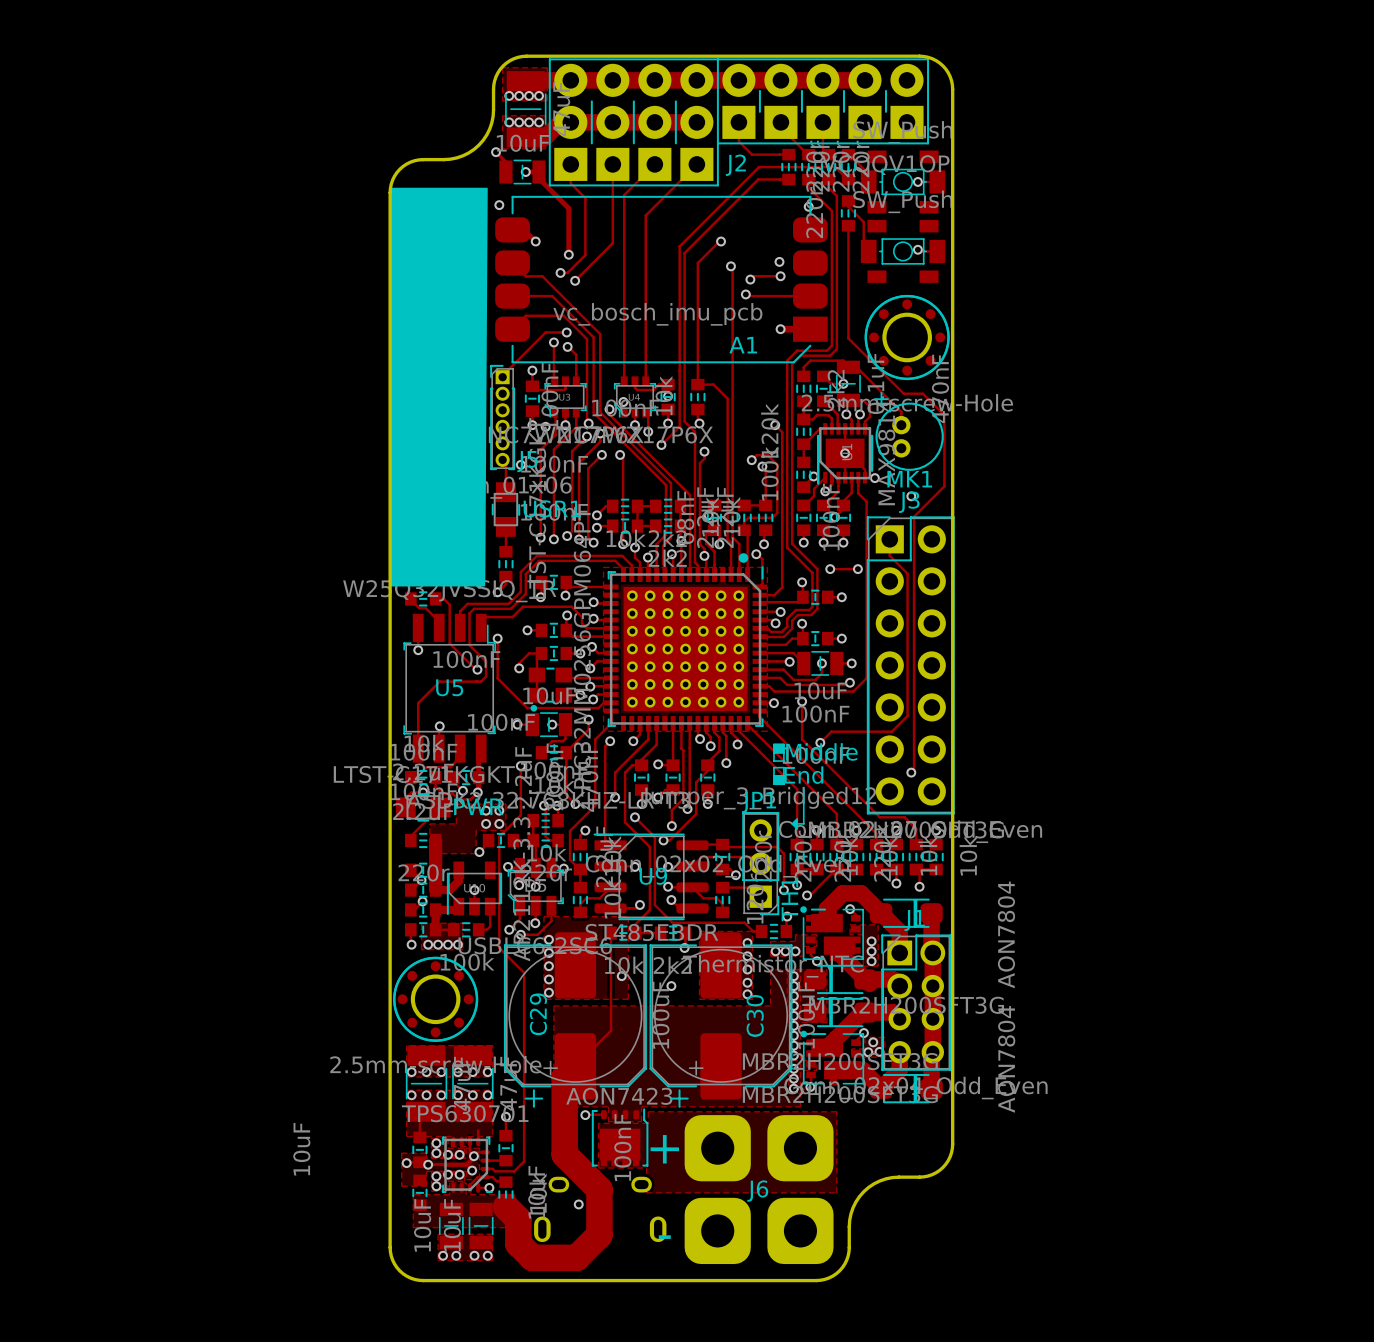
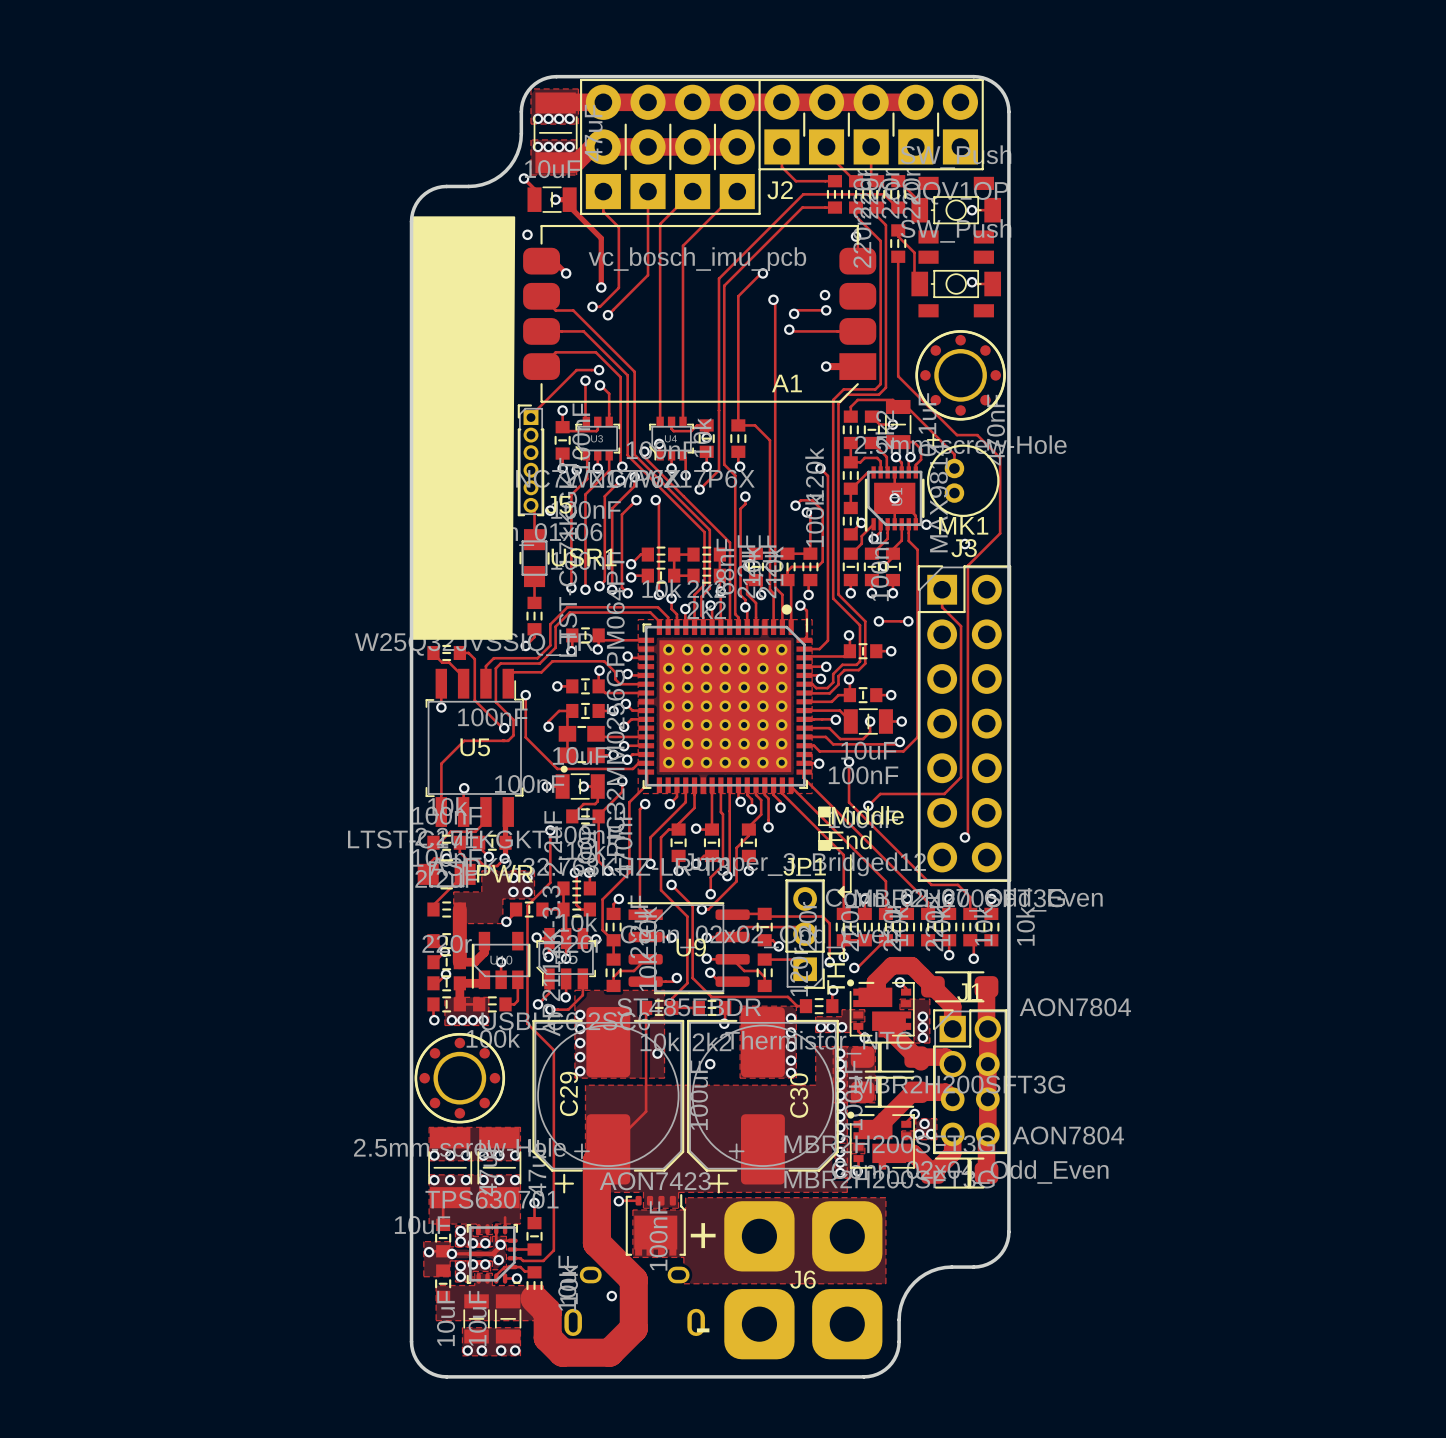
A1 value position: vc_bosch_imu_pcb (657, 314) -> vc_bosch_imu_pcb (697, 259)
part value rotation: 0° (1006, 934) -> 90° clockwise (1075, 1007)
part value rotation: 0° (1006, 1059) -> 90° clockwise (1068, 1135)
part value rotation: 0° (301, 1149) -> 90° clockwise (422, 1225)
part value position: 10uF (301, 1149) -> 10uF (422, 1225)

